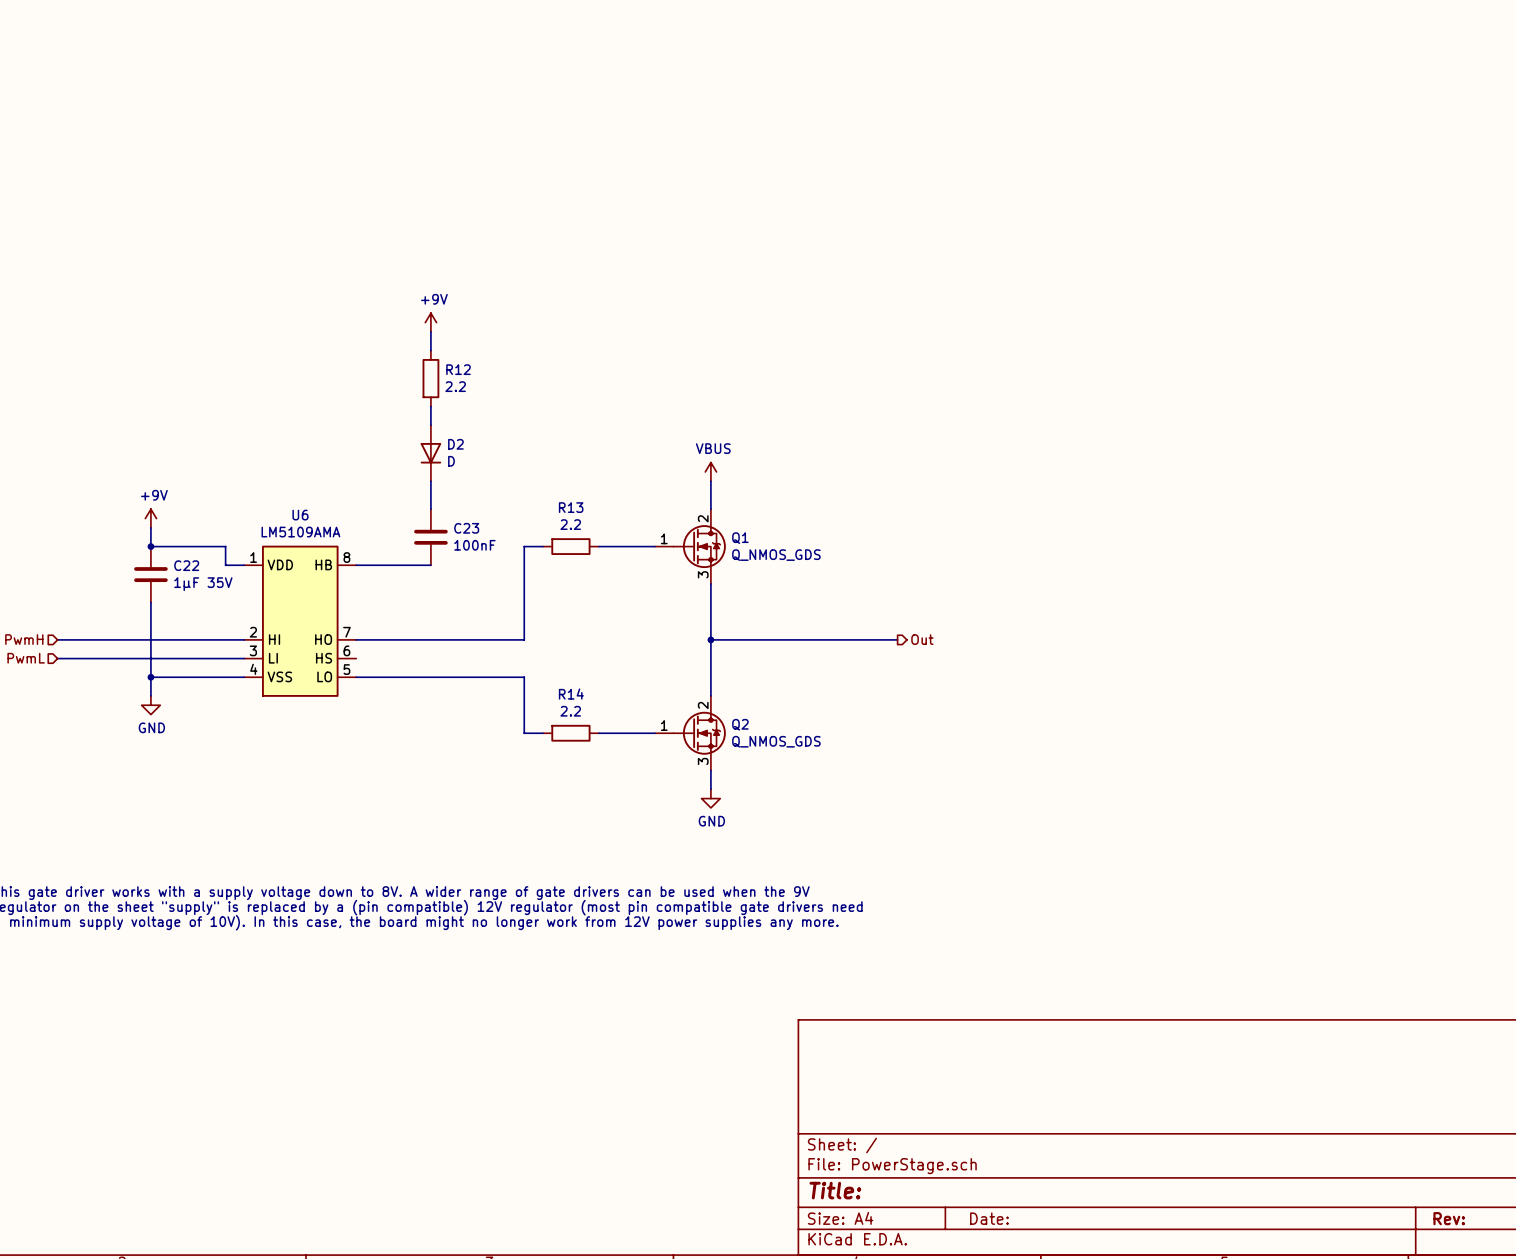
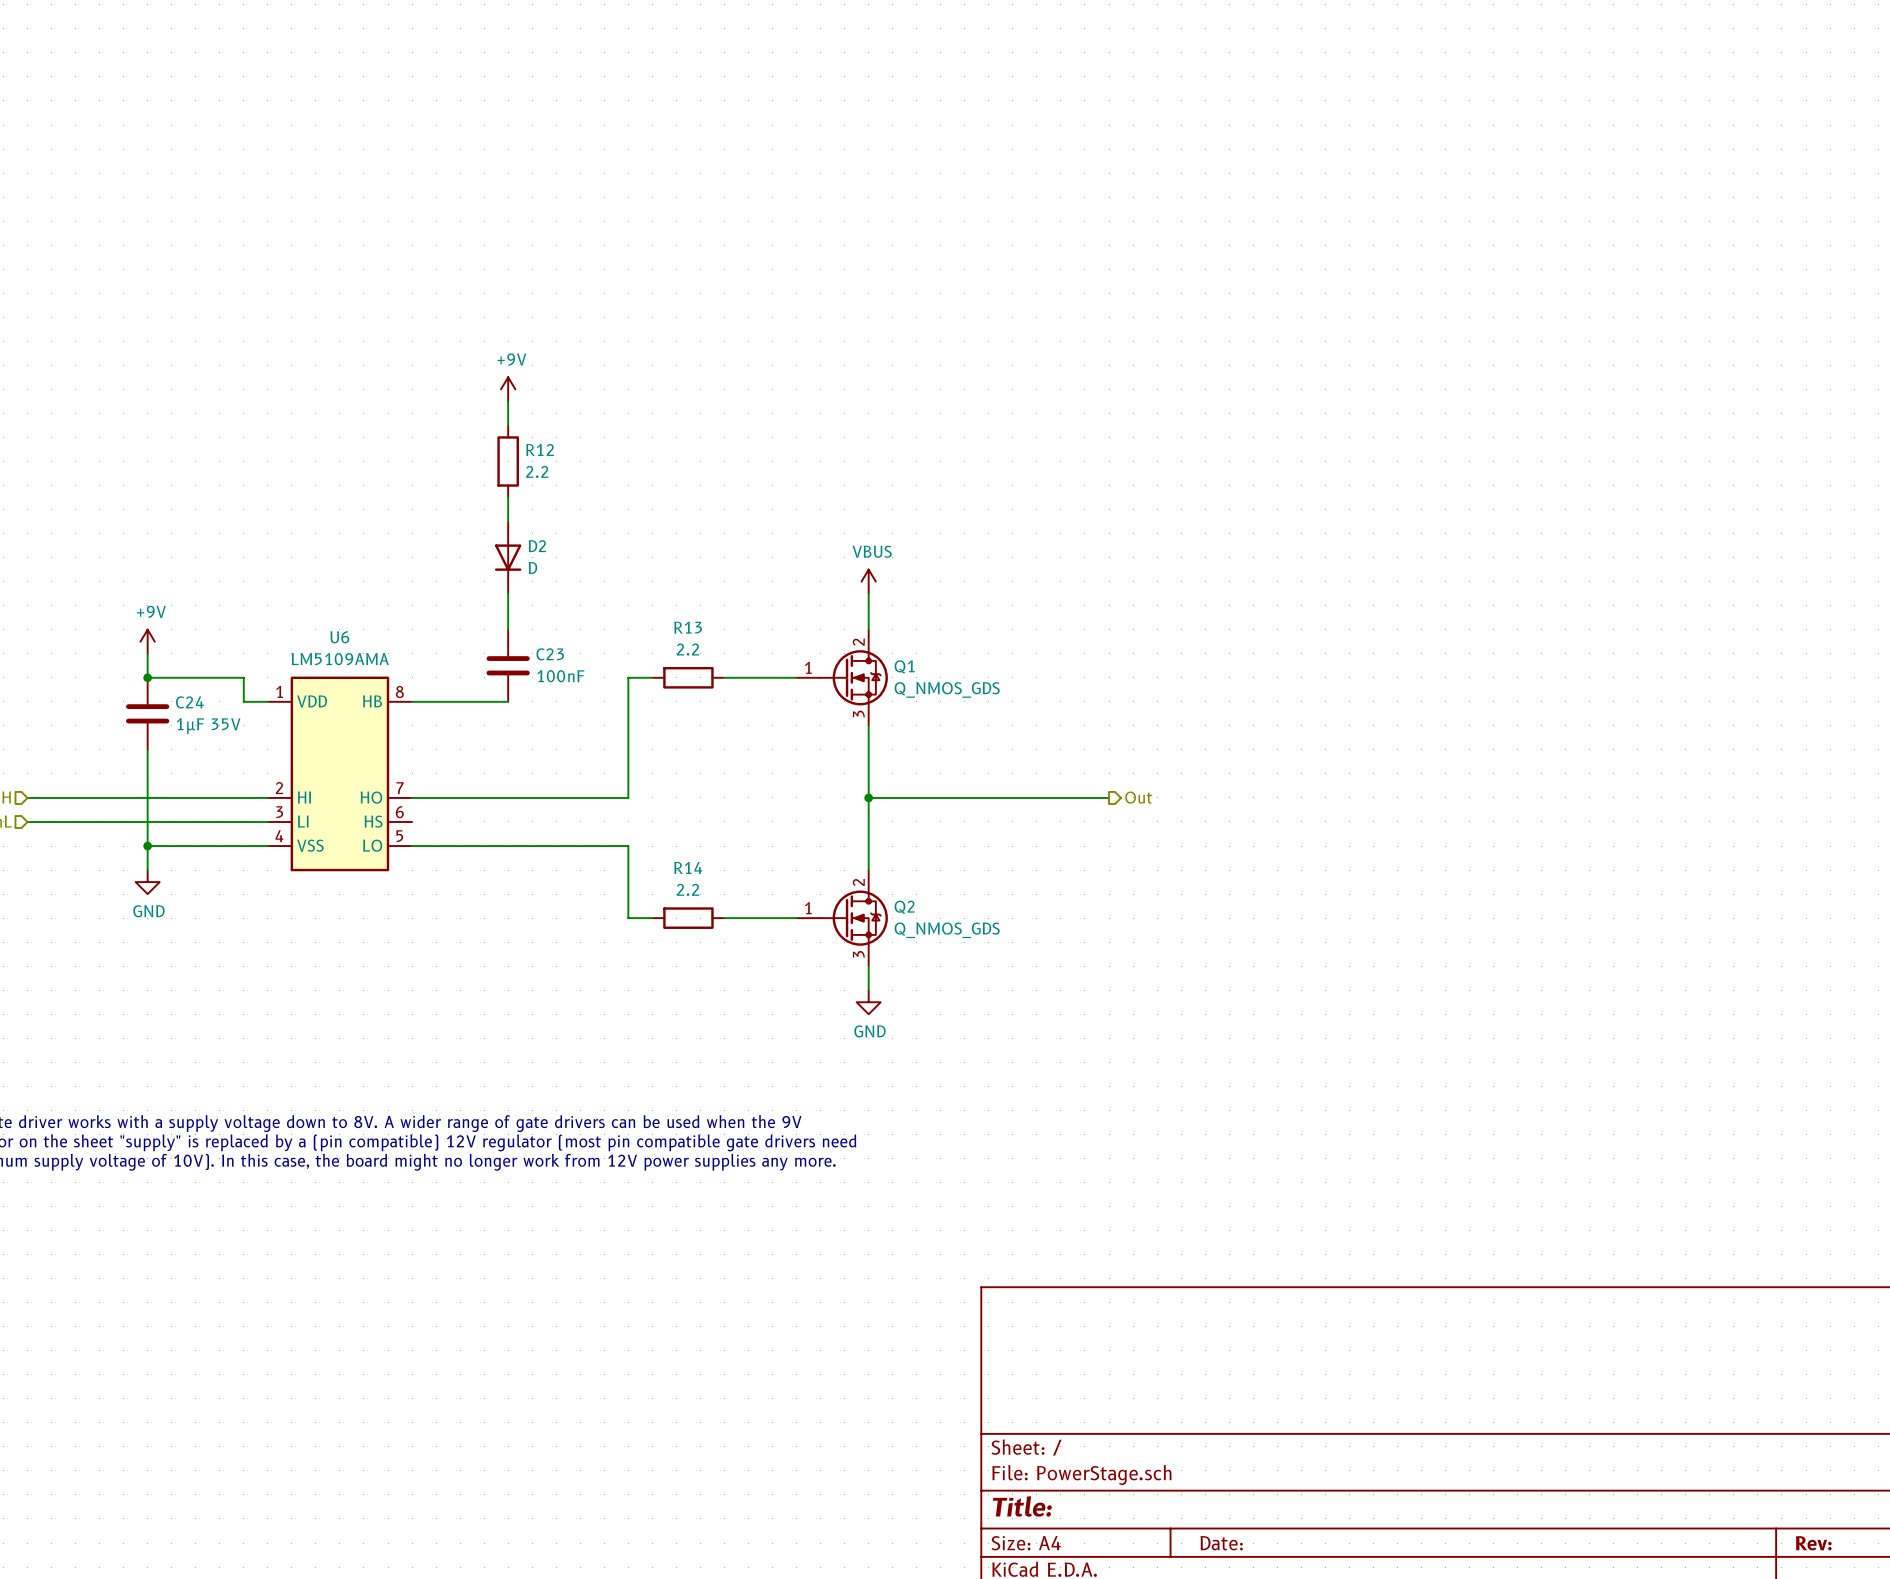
C22 name: C22 (186, 565) -> C24 (189, 702)

